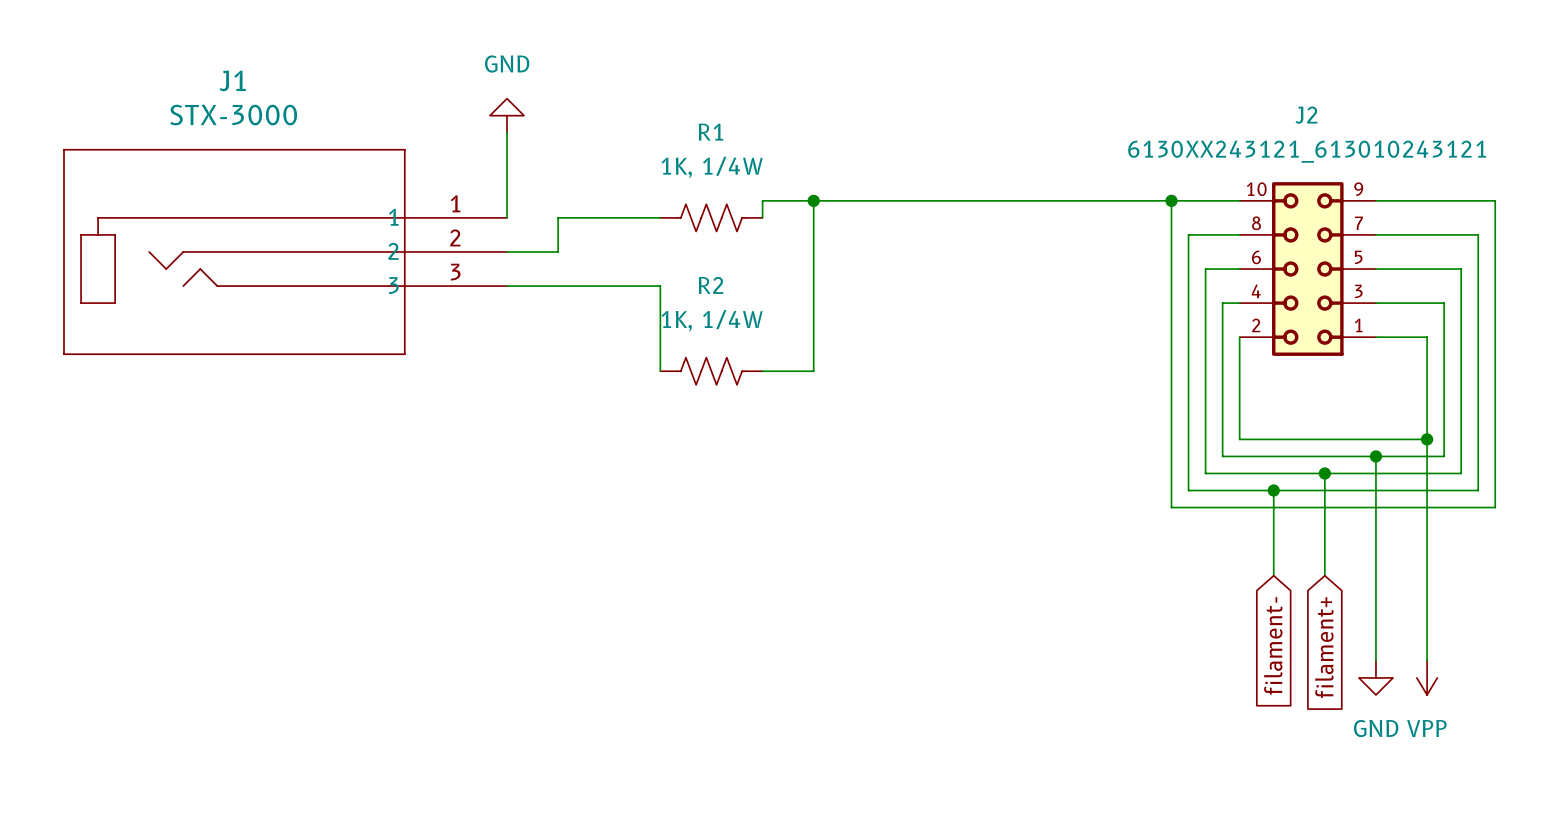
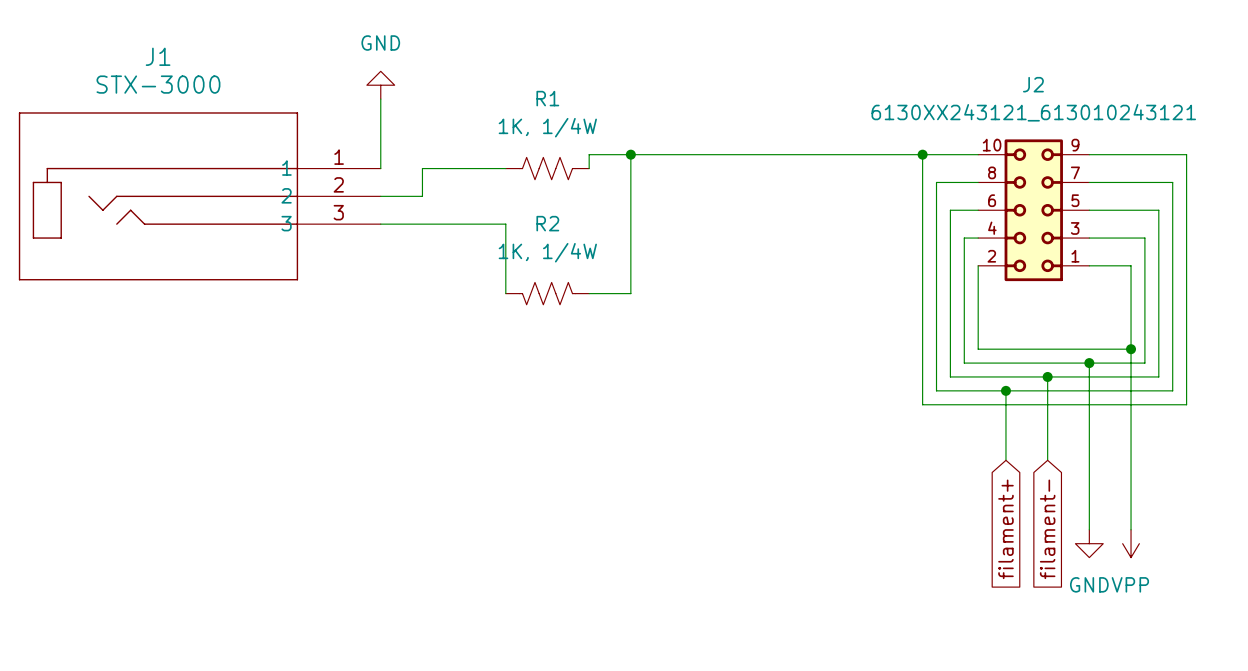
R2 flip: as is (711, 371) -> left-right (547, 293)
global label: filament- (1273, 645) -> filament+ (1005, 529)
global label: filament+ (1324, 647) -> filament- (1047, 529)

